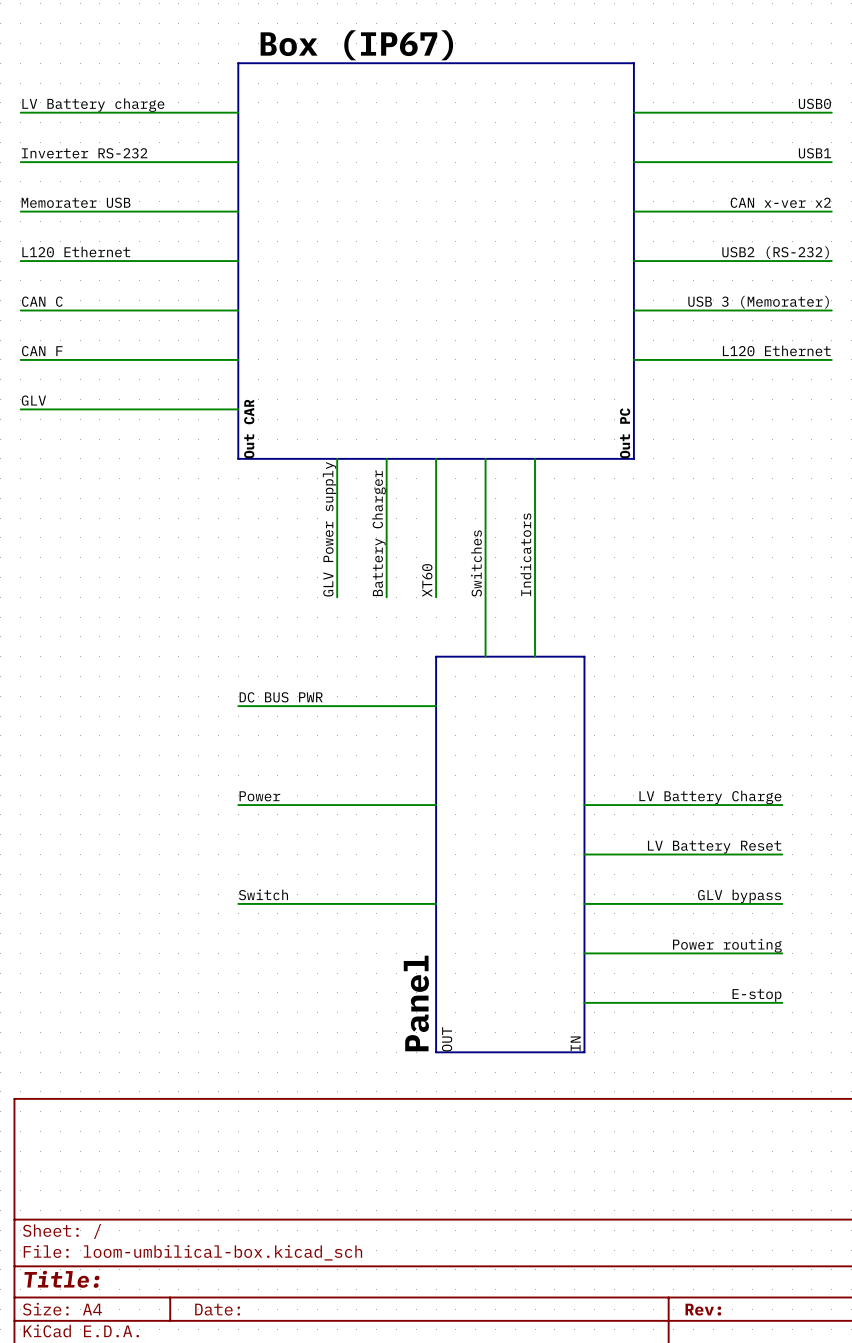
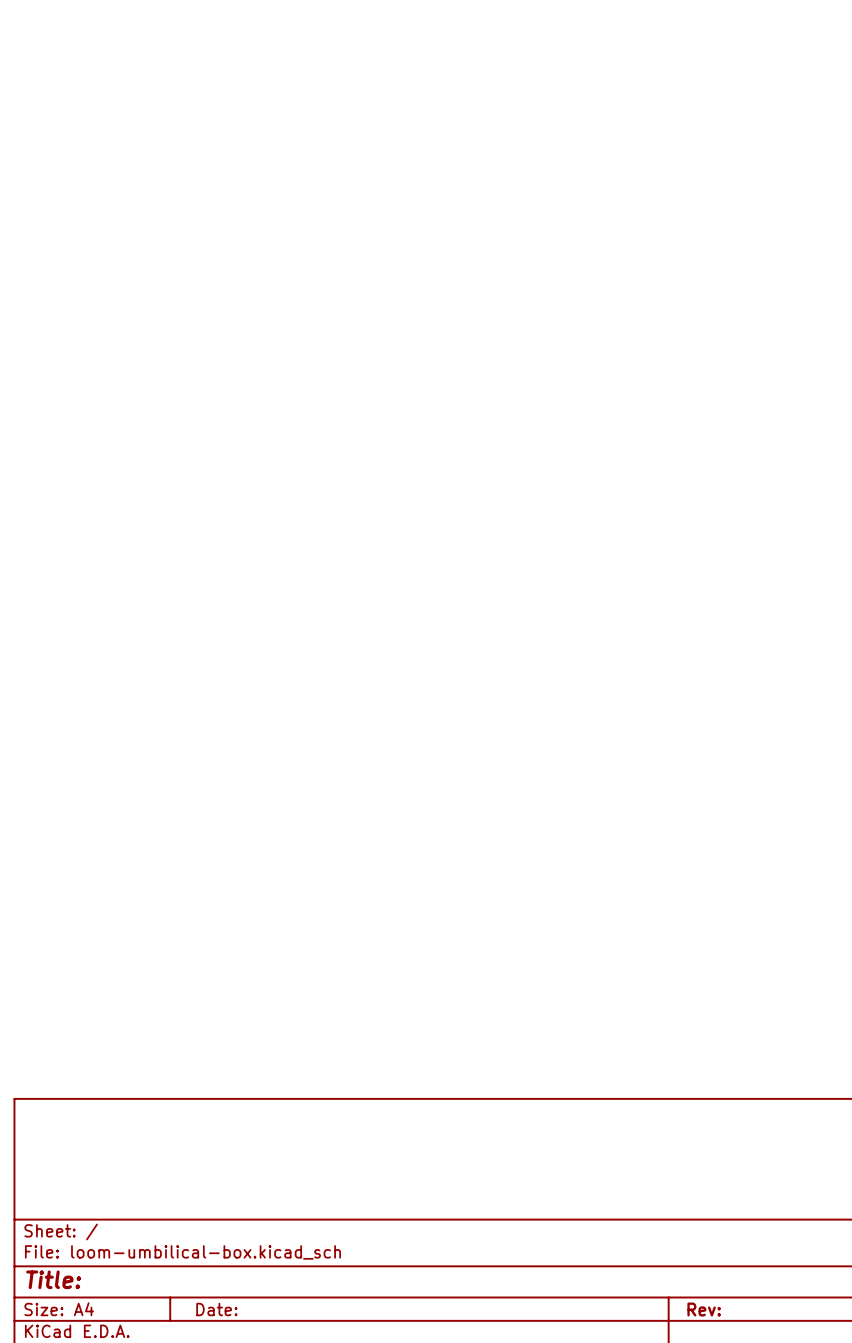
label: Box (IP67) (356, 45) -> none
line: (238, 63) (633, 63) (633, 458) (238, 458) (238, 63) -> none
label: USB0 (814, 103) -> none
label: LV Battery charge (93, 105) -> none
wire: (20, 112) (238, 112) -> none
wire: (633, 112) (831, 112) -> none
label: Inverter RS-232 (84, 153) -> none
label: USB1 (814, 153) -> none
wire: (20, 162) (238, 162) -> none
wire: (633, 162) (831, 162) -> none
label: Memorater USB (76, 202) -> none
label: CAN x-ver x2 (780, 202) -> none
wire: (20, 211) (238, 211) -> none
wire: (633, 211) (831, 211) -> none
label: L120 Ethernet (76, 252) -> none
label: USB2 (RS-232) (775, 252) -> none
wire: (20, 261) (238, 261) -> none
wire: (633, 261) (831, 261) -> none
label: CAN C (42, 301) -> none
label: USB 3 (Memorater) (758, 302) -> none
wire: (20, 310) (238, 310) -> none
wire: (633, 310) (831, 310) -> none
label: L120 Ethernet (776, 350) -> none
label: CAN F (42, 351) -> none
wire: (20, 359) (238, 359) -> none
wire: (633, 359) (831, 359) -> none
label: GLV (33, 400) -> none
wire: (20, 409) (238, 409) -> none
label: Out CAR (249, 429) -> none
label: Out PC (625, 433) -> none
wire: (337, 458) (337, 597) -> none
wire: (386, 458) (386, 597) -> none
wire: (436, 458) (436, 597) -> none
wire: (485, 458) (485, 656) -> none
wire: (535, 458) (535, 656) -> none
label: GLV Power supply (329, 529) -> none
label: Battery Charger (379, 533) -> none
label: Indicators (525, 554) -> none
label: Switches (476, 563) -> none
label: XT60 (427, 580) -> none
line: (436, 656) (584, 656) (584, 1052) (436, 1052) (436, 656) -> none
label: DC BUS PWR (281, 697) -> none
wire: (238, 706) (436, 706) -> none
label: Power (259, 796) -> none
label: LV Battery Charge (710, 797) -> none
wire: (238, 805) (436, 805) -> none
wire: (584, 805) (782, 805) -> none
label: LV Battery Reset (714, 847) -> none
wire: (584, 854) (782, 854) -> none
label: Switch (263, 894) -> none
label: GLV bypass (739, 896) -> none
wire: (238, 903) (436, 903) -> none
wire: (584, 903) (782, 903) -> none
label: Power routing (727, 945) -> none
wire: (584, 953) (782, 953) -> none
label: E-stop (756, 995) -> none
wire: (584, 1002) (782, 1002) -> none
label: Panel (416, 1003) -> none
label: OUT (447, 1039) -> none
label: IN (575, 1043) -> none

